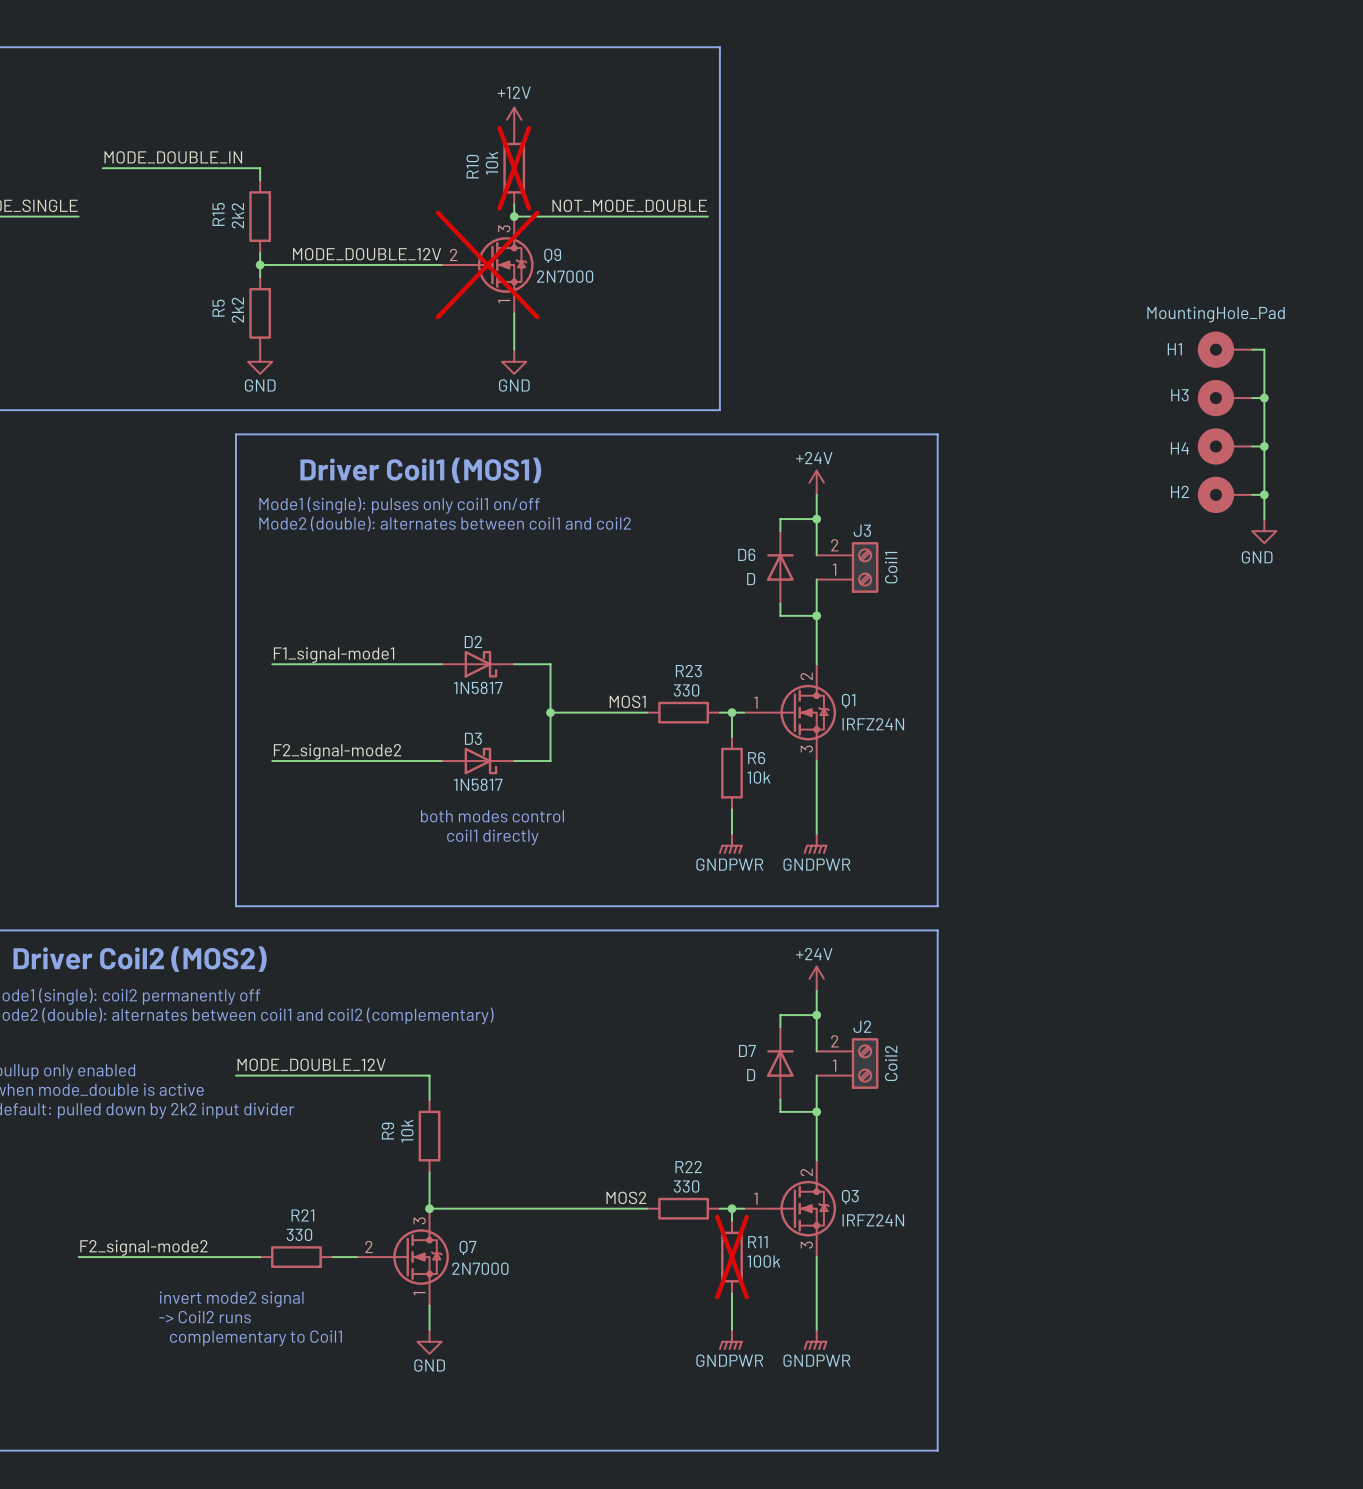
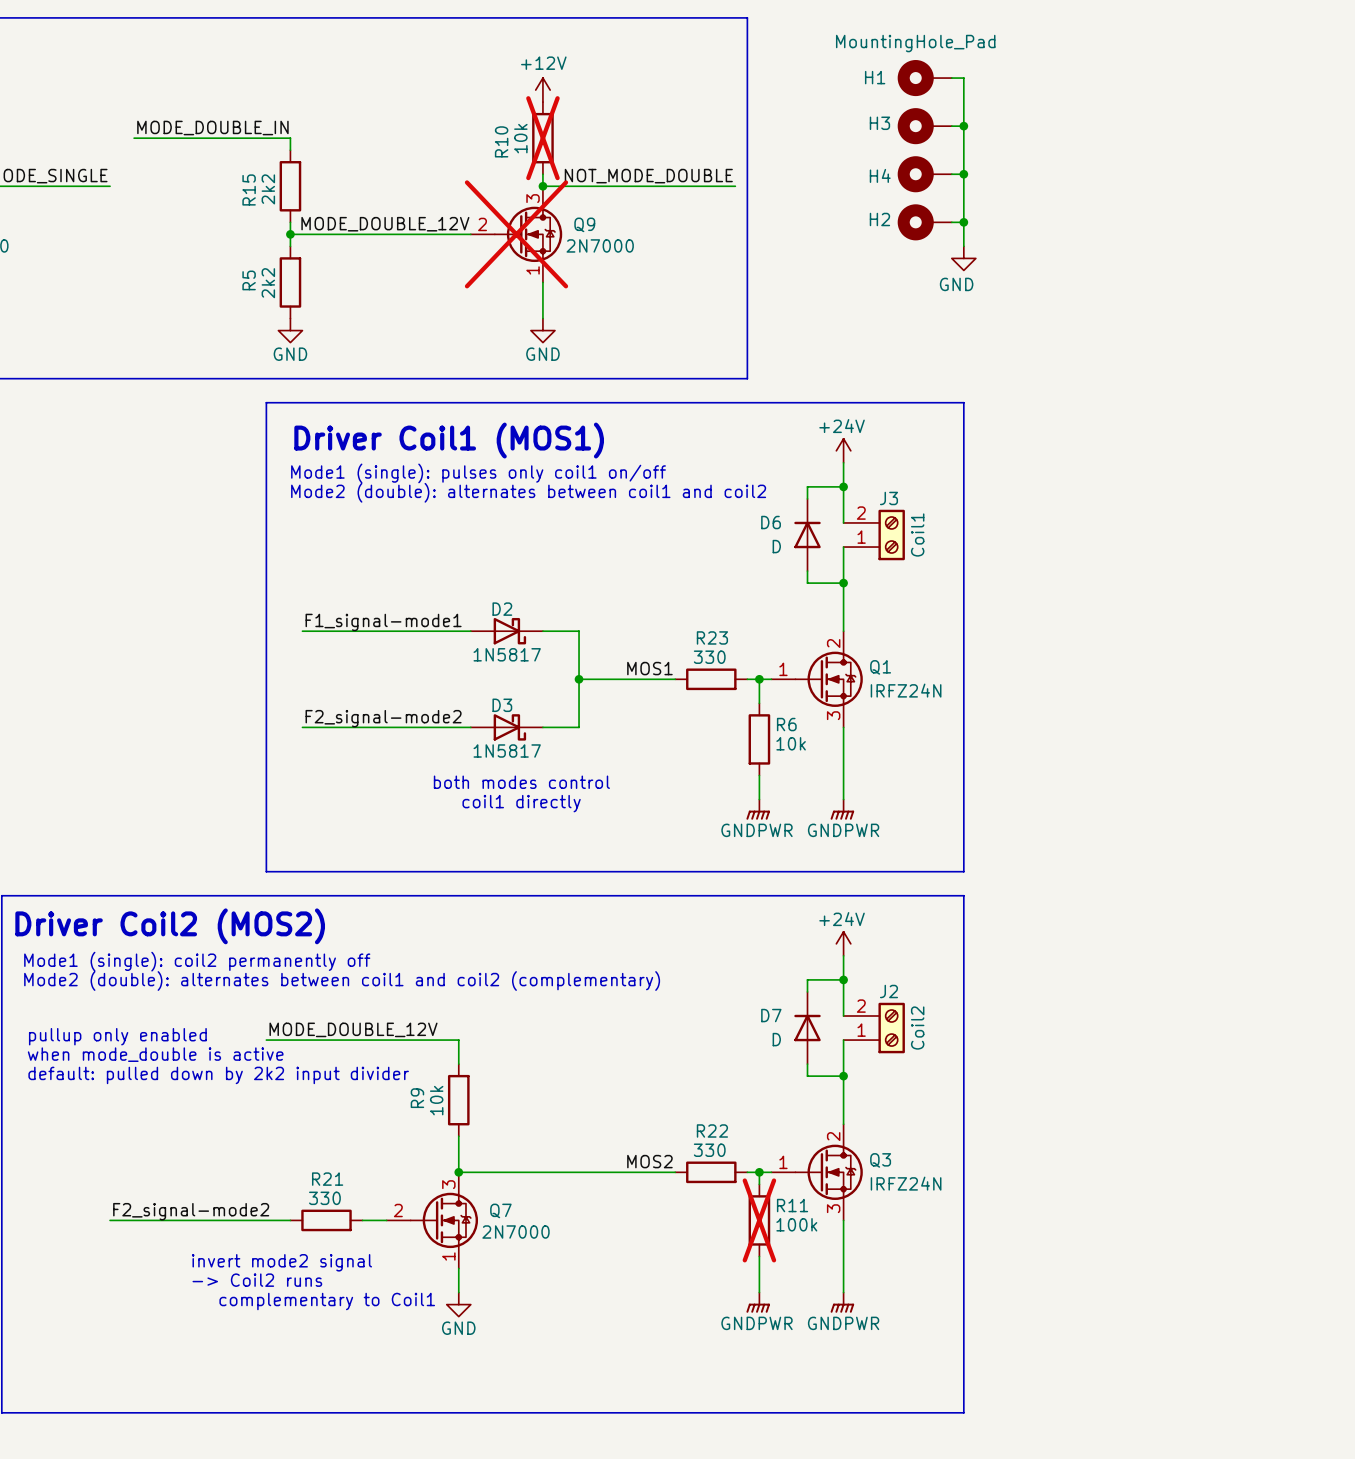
wire: none -> (951, 78) (963, 78) (963, 246)
wire: none -> (951, 126) (963, 126)
junction: none -> (963, 126)
wire: none -> (951, 174) (963, 174)
junction: none -> (963, 174)
wire: none -> (951, 222) (963, 222)
junction: none -> (963, 222)
power symbol: none -> GND (963, 258)
H1 position: (1225, 349) -> (924, 78)
wire: (1252, 349) (1264, 349) (1264, 519) -> none
H3 position: (1225, 398) -> (924, 126)
wire: (1252, 398) (1264, 398) -> none
junction: (1264, 398) -> none
H4 position: (1225, 446) -> (924, 174)
wire: (1252, 446) (1264, 446) -> none
junction: (1264, 446) -> none
H2 position: (1225, 494) -> (924, 222)
wire: (1252, 494) (1264, 494) -> none
junction: (1264, 494) -> none
power symbol: GND (1264, 531) -> none

